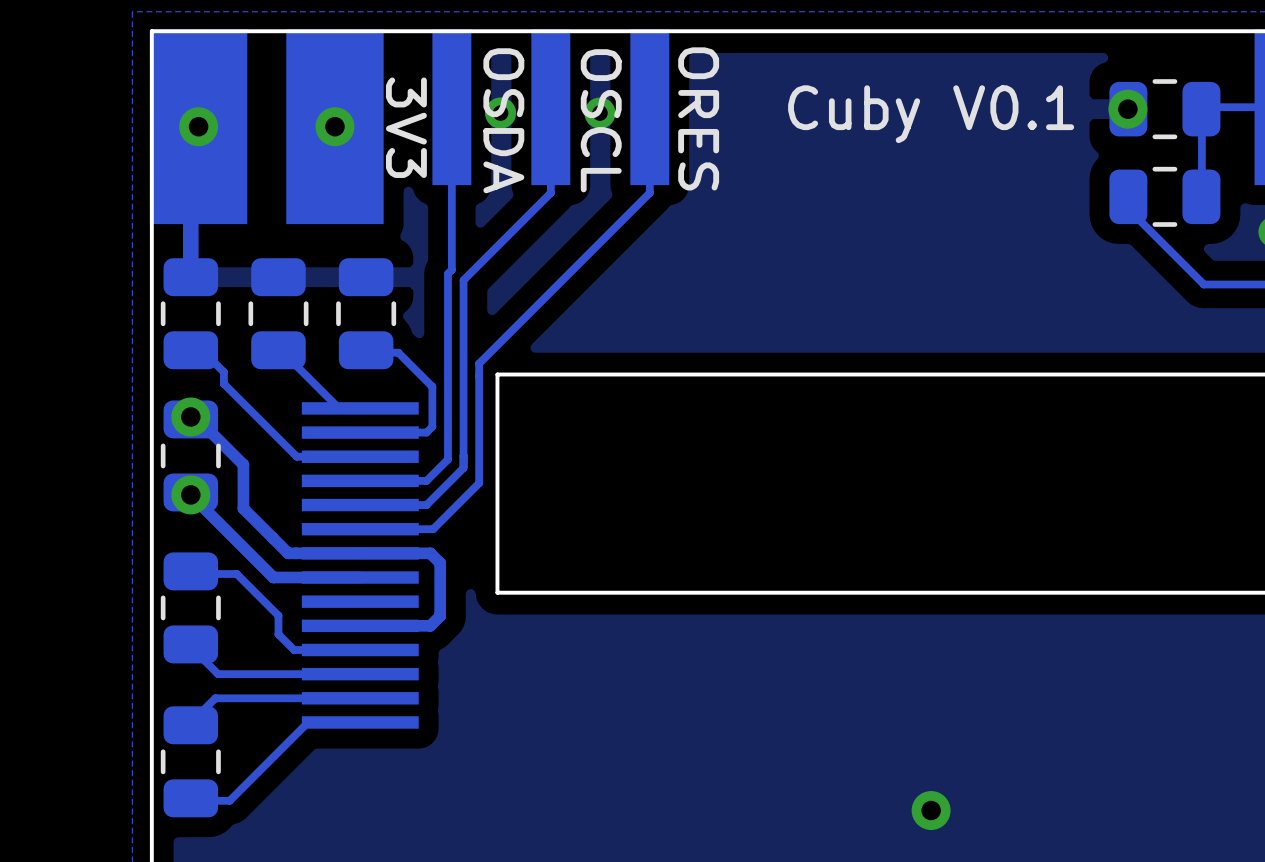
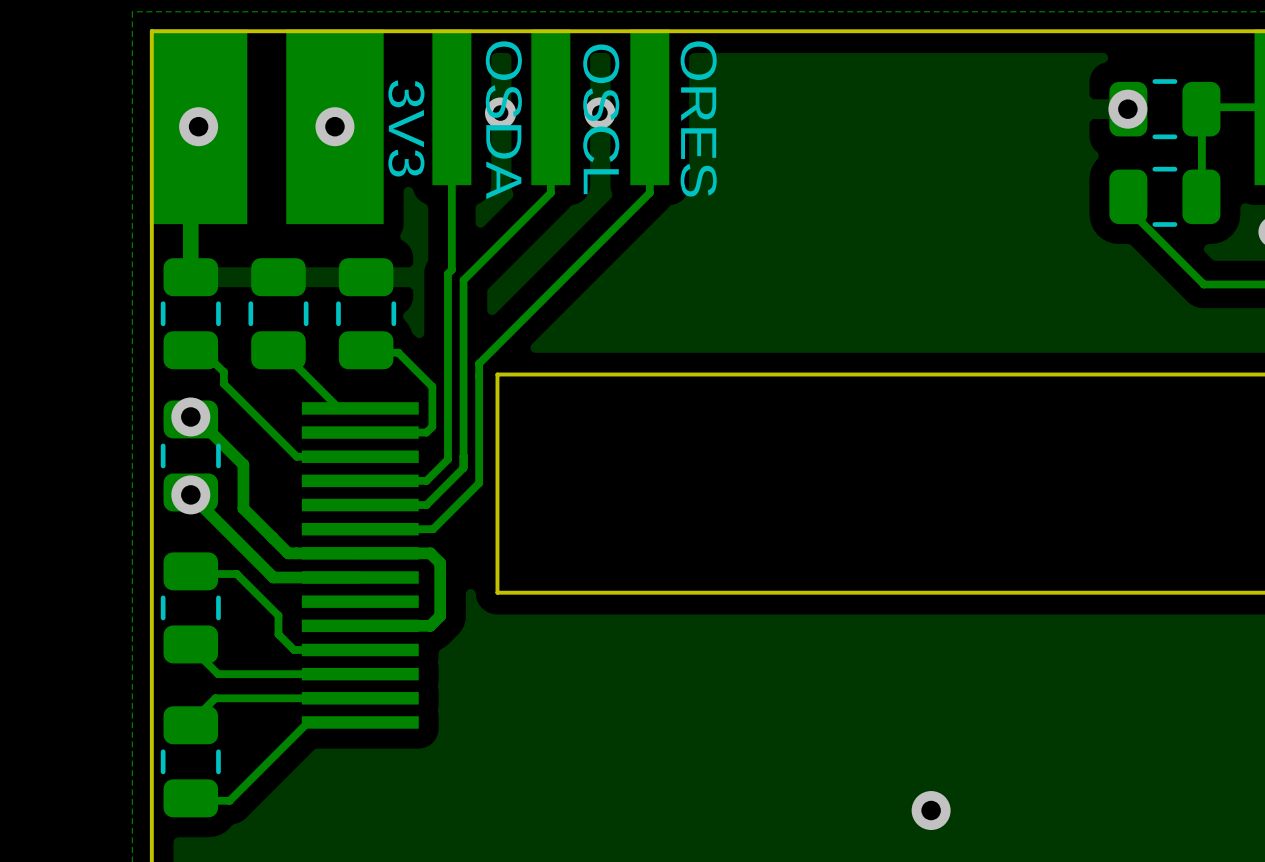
text: Cuby V0.1 (931, 114) -> none

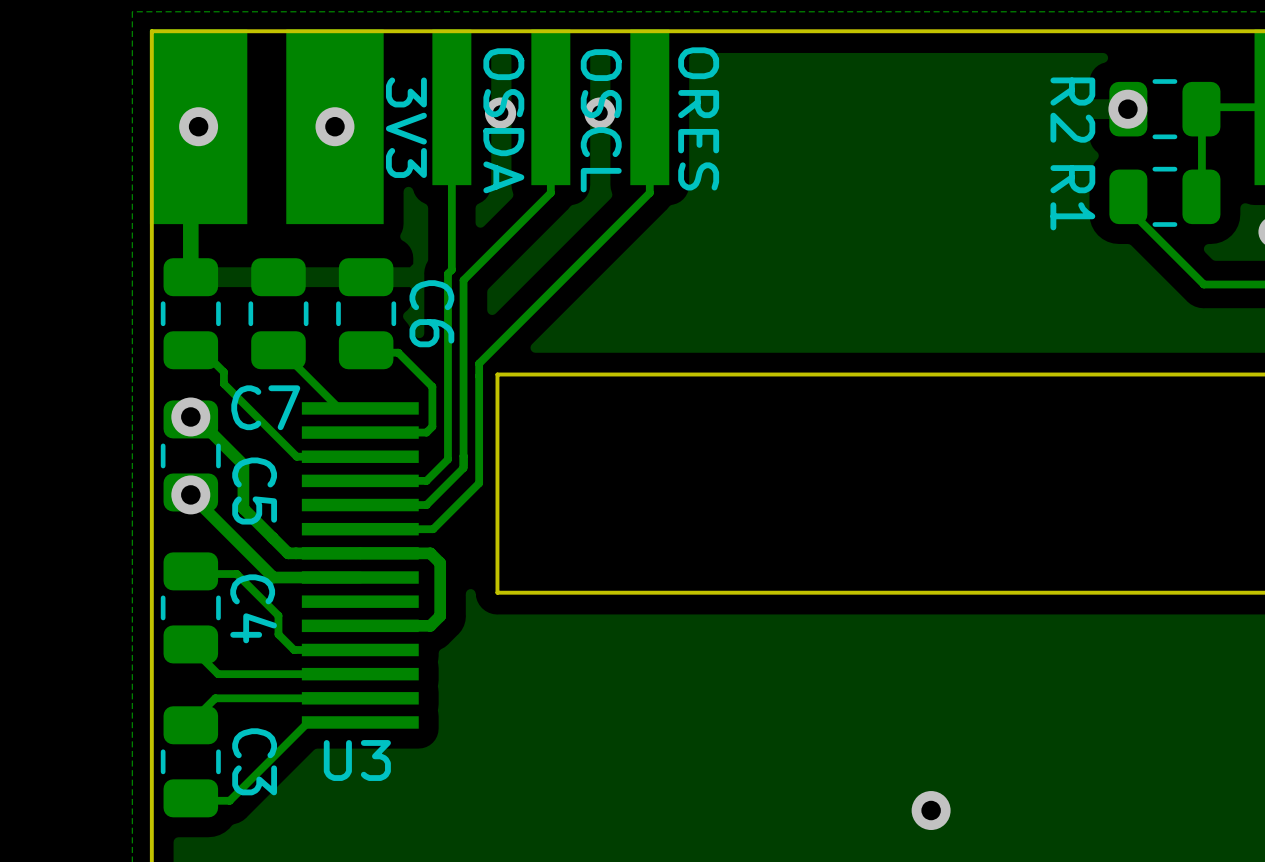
R2 name: none -> R2 (1072, 110)
R1 name: none -> R1 (1072, 197)
C6 name: none -> C6 (431, 313)
C7 name: none -> C7 (265, 407)
C5 name: none -> C5 (254, 491)
C4 name: none -> C4 (253, 608)
U3 name: none -> U3 (357, 760)
C3 name: none -> C3 (254, 761)

